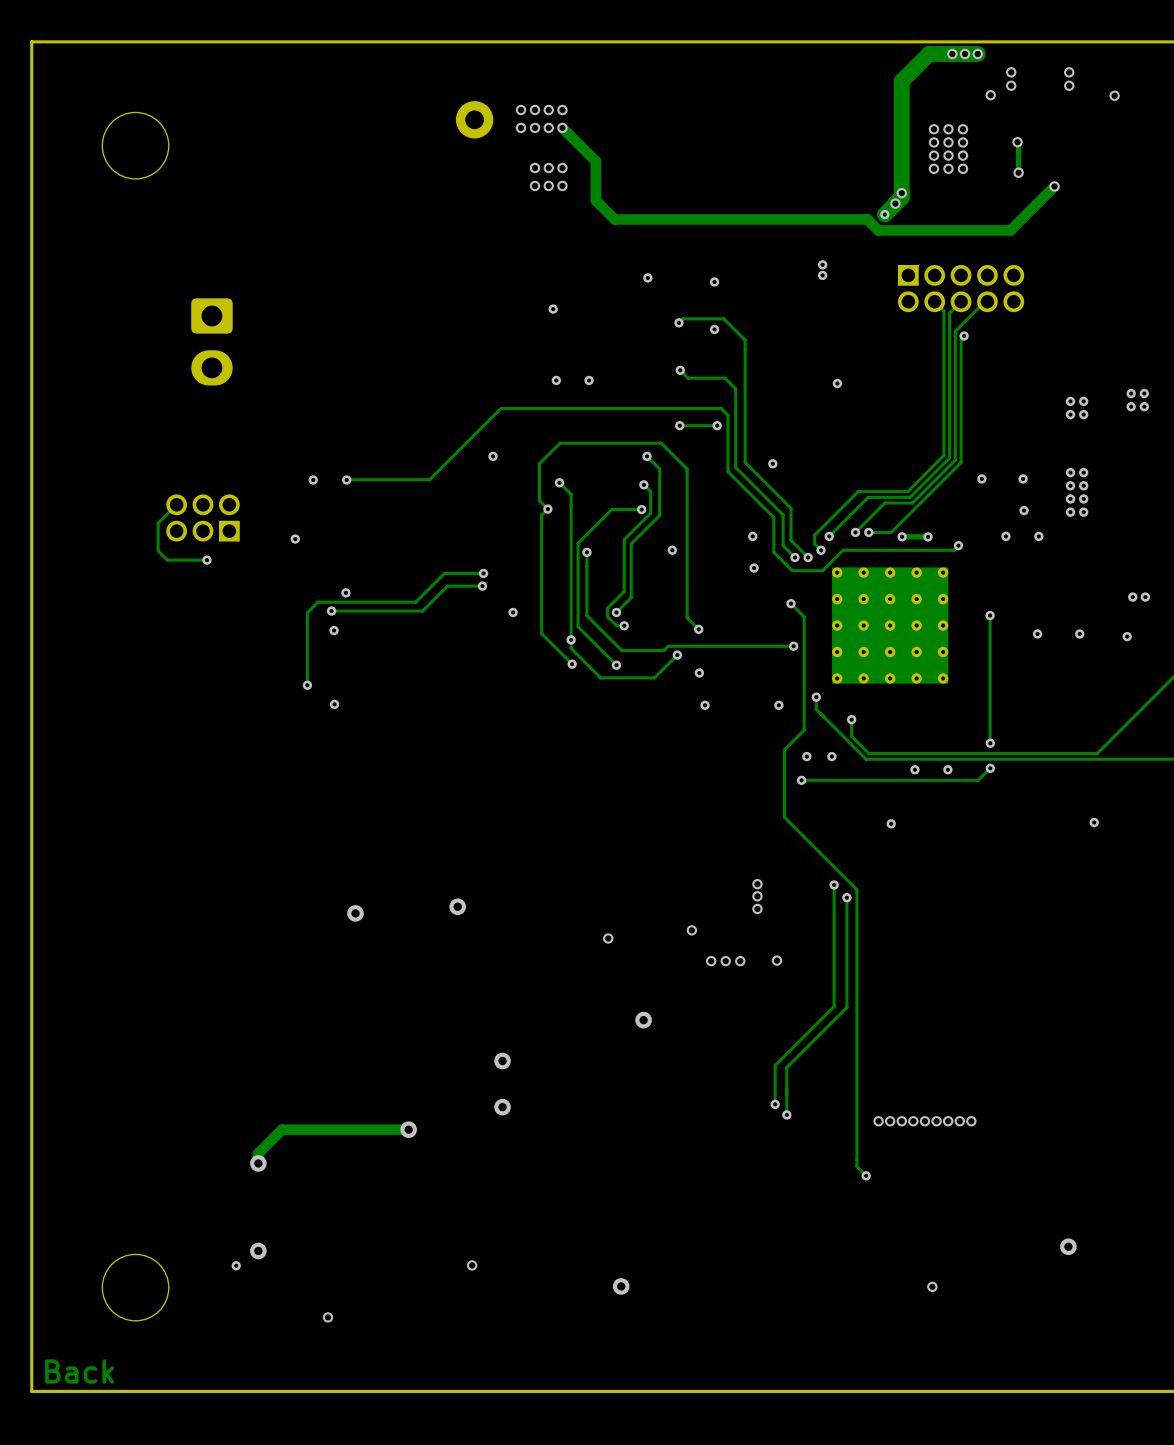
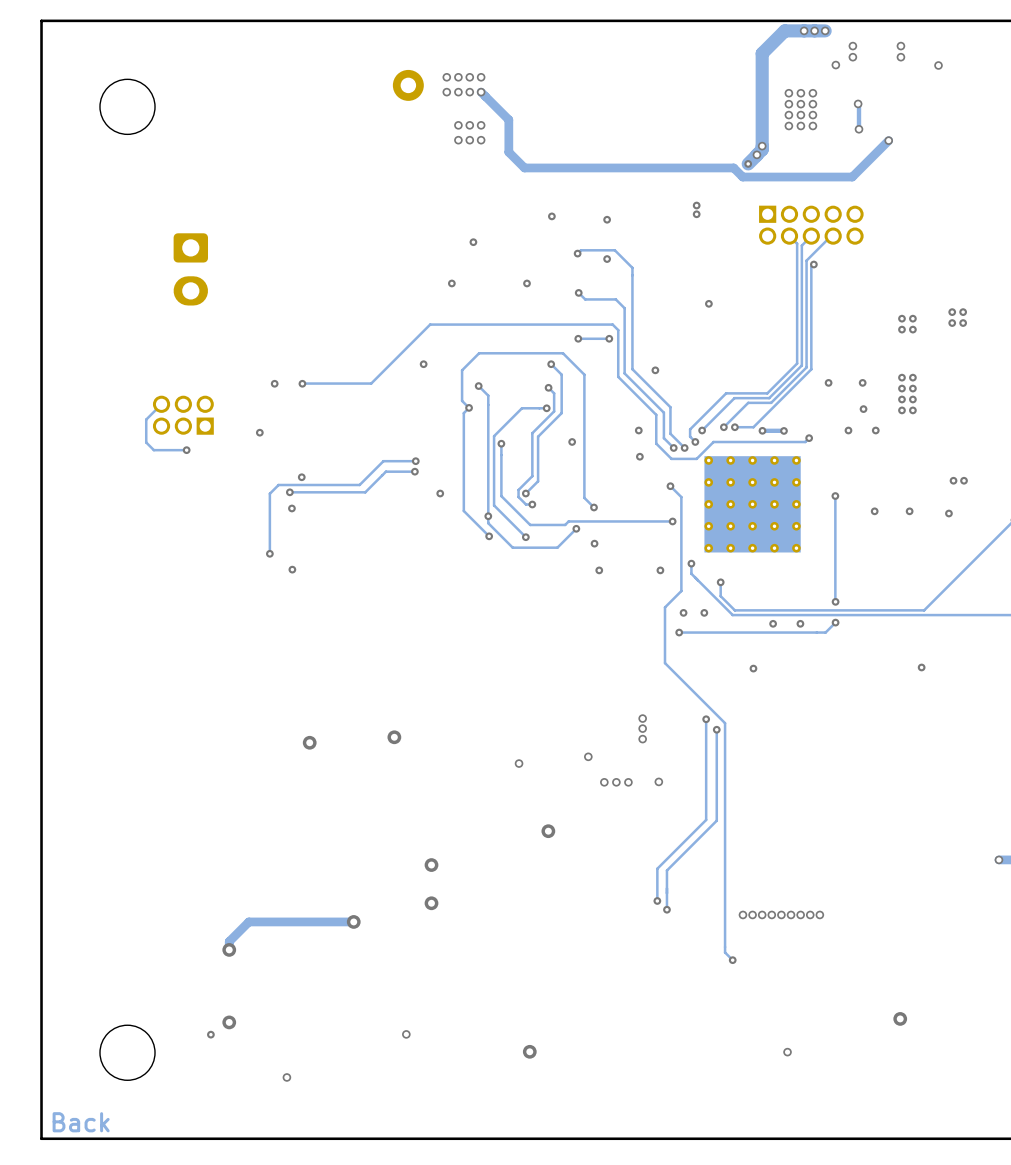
via: none -> (451, 283)
via: none -> (527, 283)
via: (556, 380) -> none
via: (589, 380) -> none

